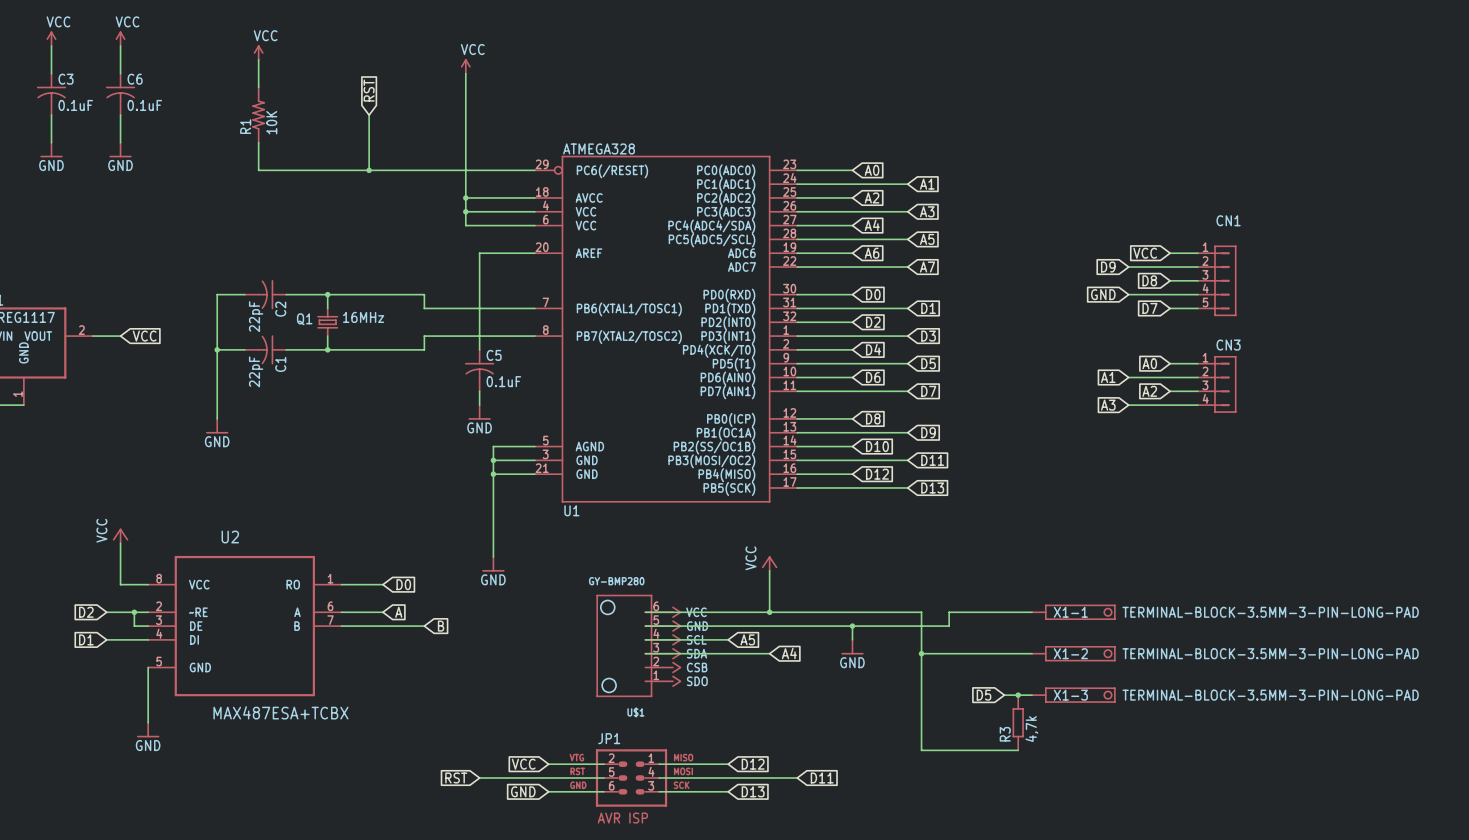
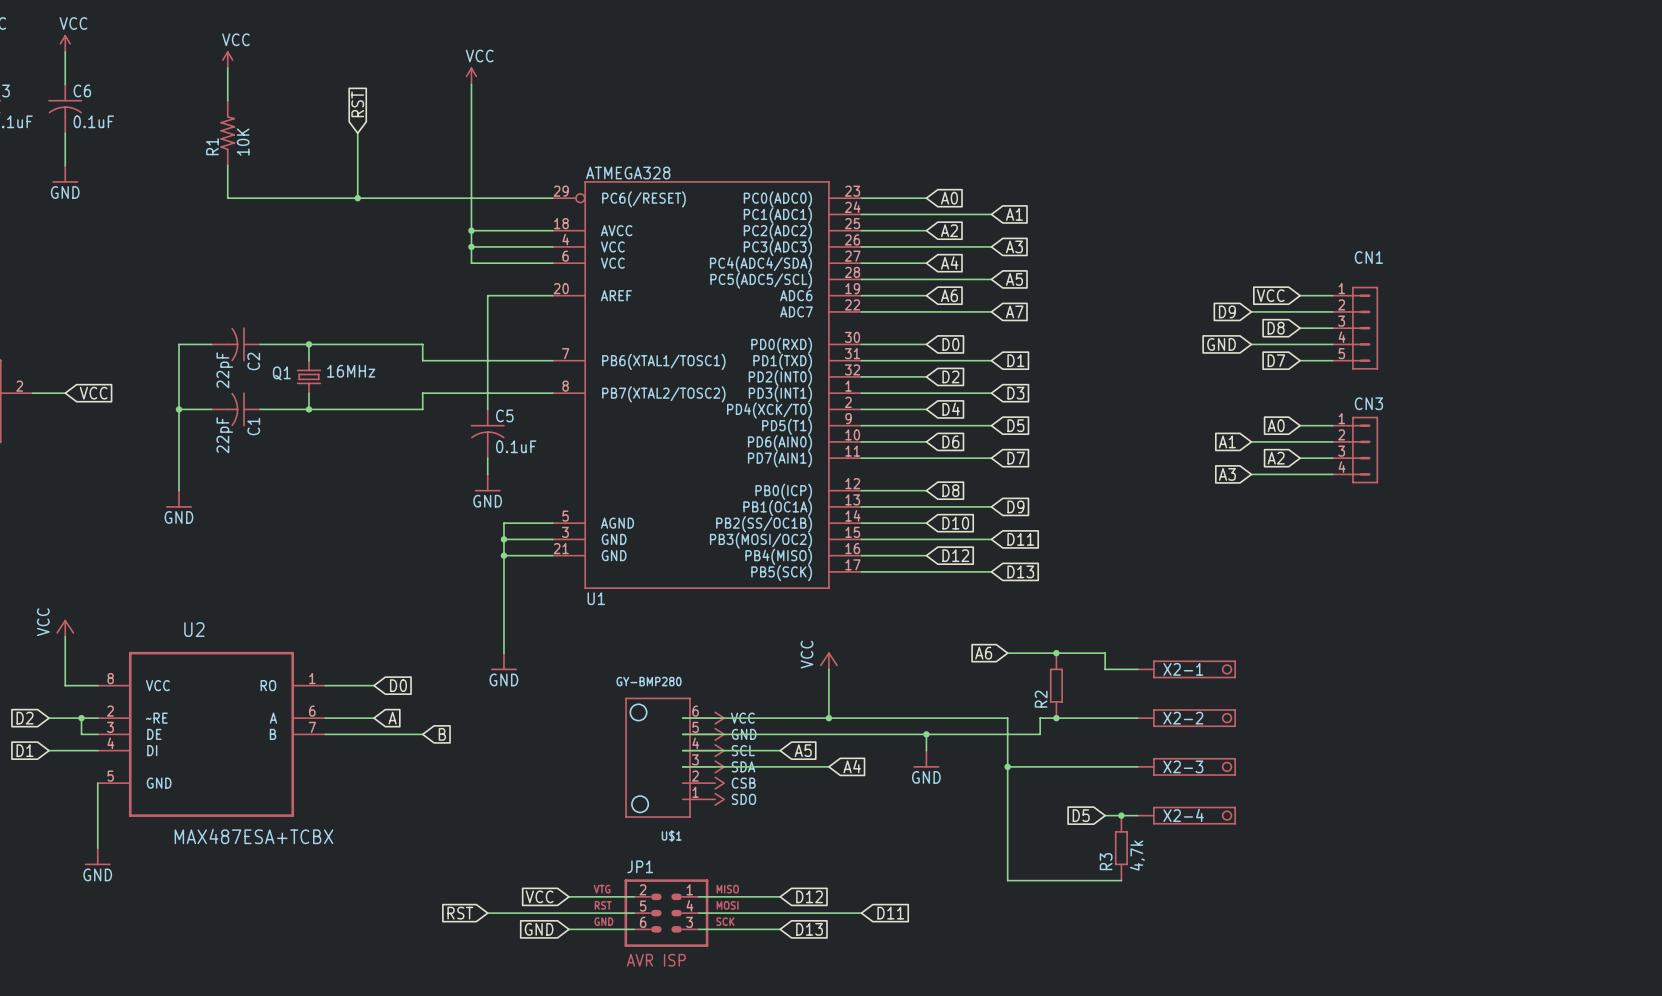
global label: none -> A6 (983, 653)
wire: none -> (1007, 653) (1105, 653) (1105, 669) (1137, 669)
junction: none -> (1056, 653)
X2-1: none -> (1186, 669)
R2: none -> (1056, 685)
junction: none -> (1056, 718)
X1-1 name: X1-1 (1070, 612) -> X2-2 (1183, 718)
X1-1 value: TERMINAL-BLOCK-3.5MM-3-PIN-LONG-PAD (1270, 612) -> none
X1-2 name: X1-2 (1070, 653) -> X2-3 (1183, 766)
X1-2 value: TERMINAL-BLOCK-3.5MM-3-PIN-LONG-PAD (1270, 653) -> none
X1-3 name: X1-3 (1070, 695) -> X2-4 (1183, 815)
X1-3 value: TERMINAL-BLOCK-3.5MM-3-PIN-LONG-PAD (1270, 695) -> none

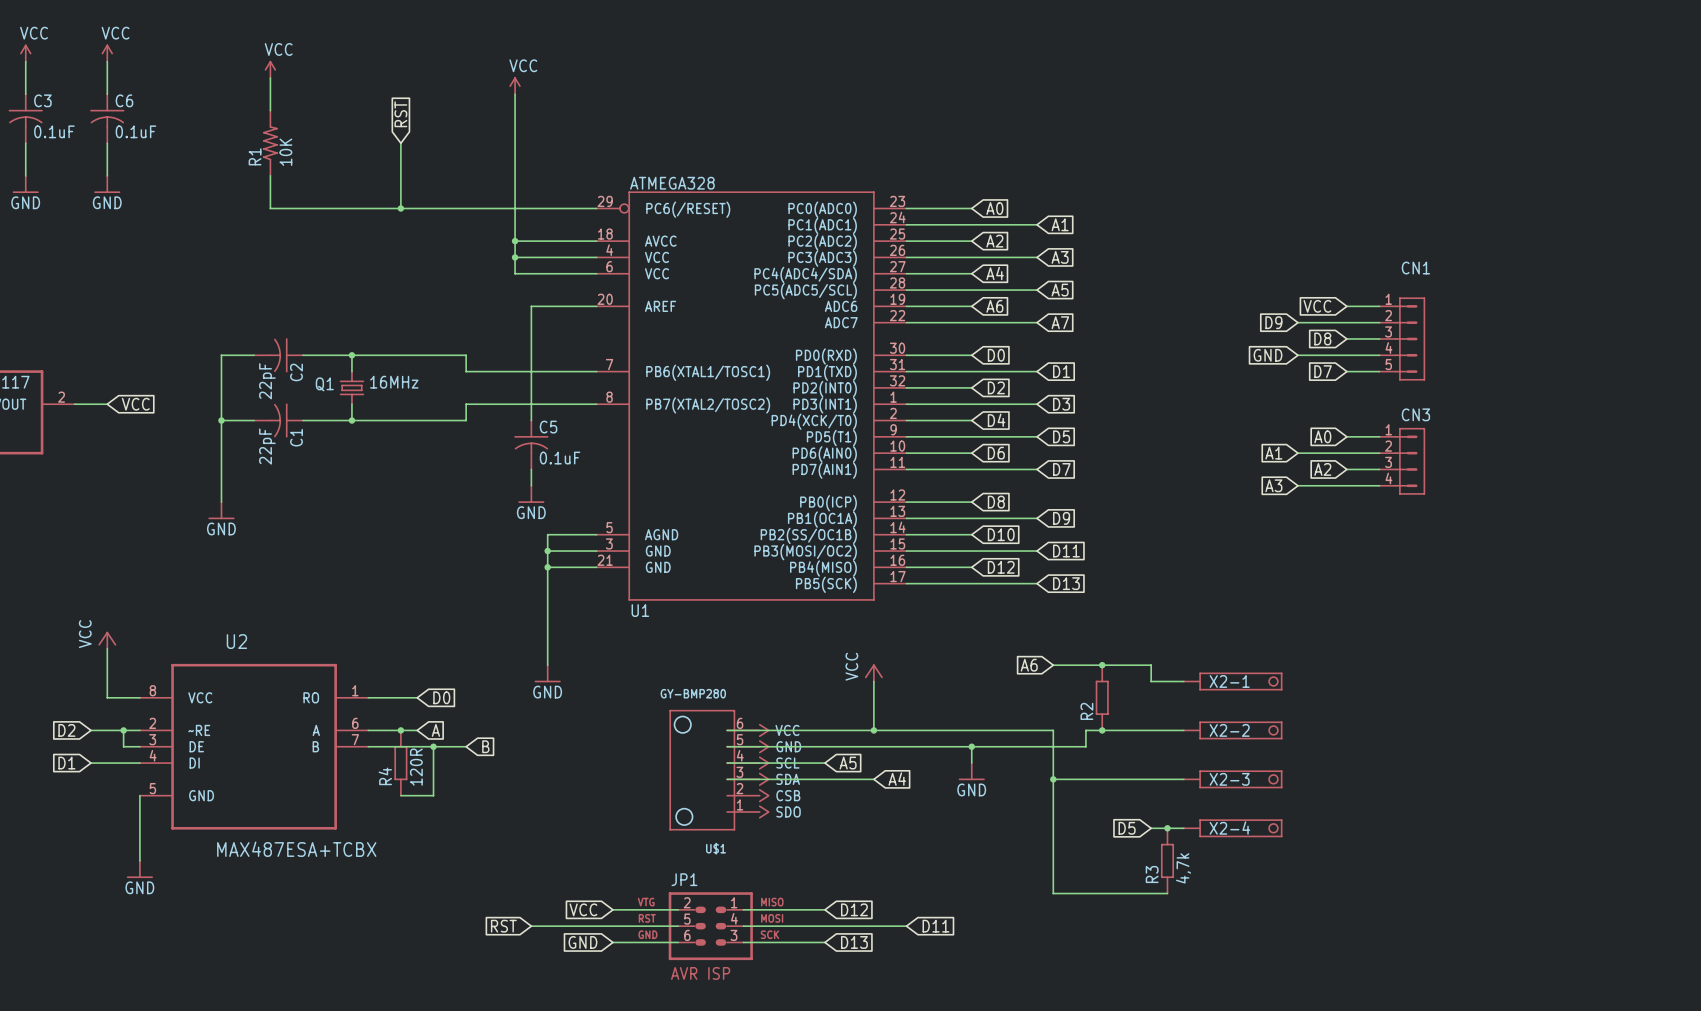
junction: none -> (400, 730)
wire: none -> (433, 746) (433, 795) (400, 795)
junction: none -> (433, 746)
R4: none -> 120R (400, 763)

